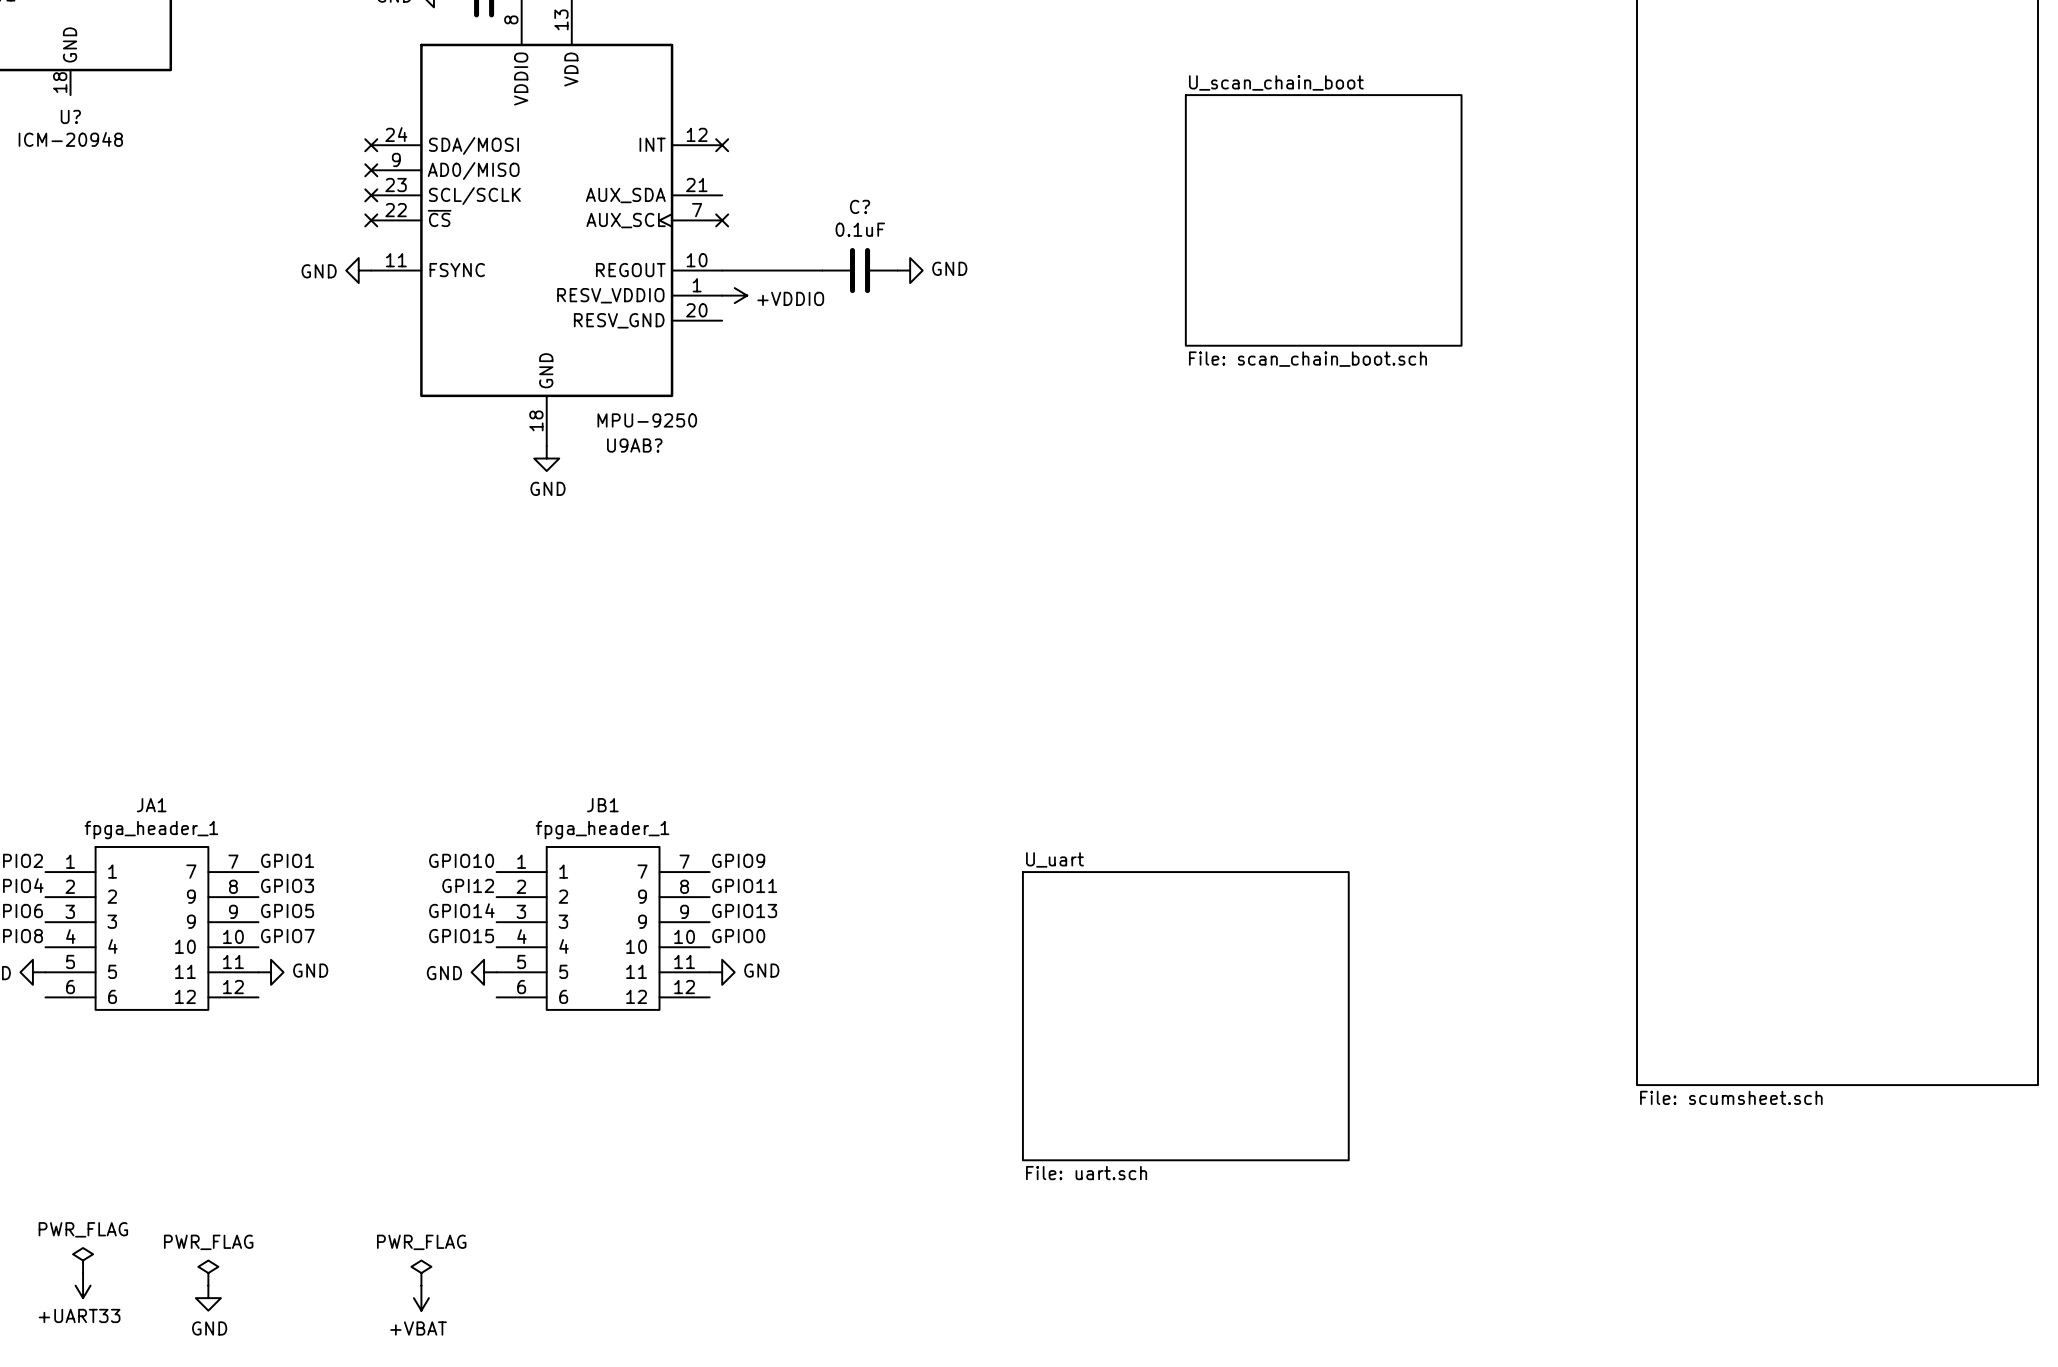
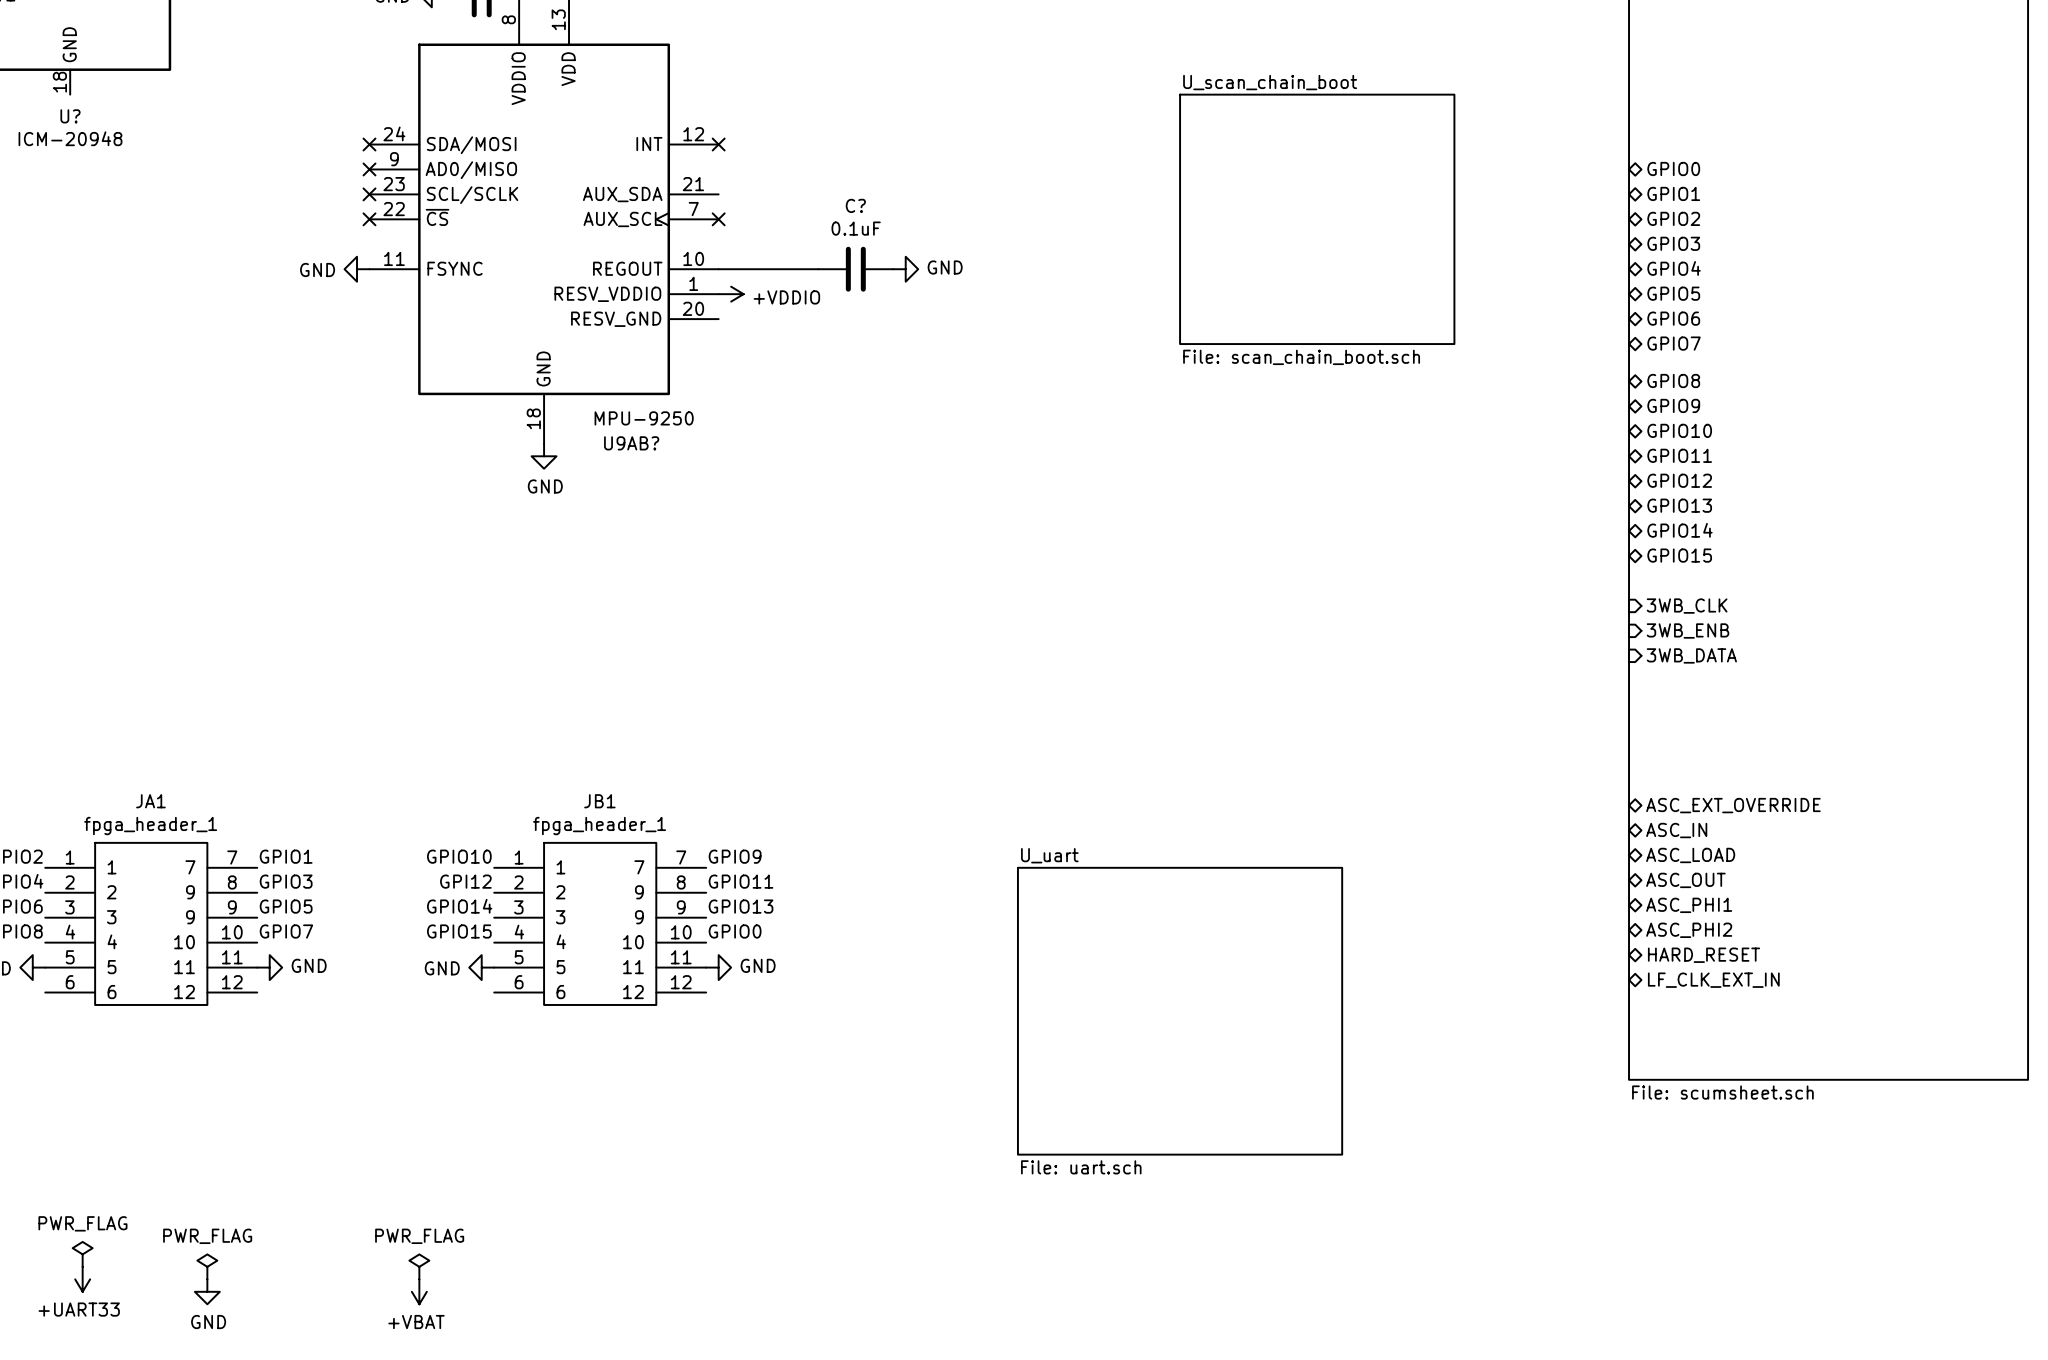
sheet pin: none -> GPIO0 (1673, 168)
sheet pin: none -> GPIO1 (1673, 193)
sheet pin: none -> GPIO2 (1673, 218)
sheet pin: none -> GPIO3 (1673, 243)
sheet pin: none -> GPIO4 (1674, 268)
sheet pin: none -> GPIO5 (1673, 293)
sheet pin: none -> GPIO6 (1673, 318)
sheet pin: none -> GPIO7 (1674, 343)
sheet pin: none -> GPIO8 (1673, 380)
sheet pin: none -> GPIO9 (1673, 405)
sheet pin: none -> GPIO10 (1679, 430)
sheet pin: none -> GPIO11 (1679, 455)
sheet pin: none -> GPIO12 (1679, 480)
sheet pin: none -> GPIO13 (1679, 505)
sheet pin: none -> GPIO14 (1679, 530)
sheet pin: none -> GPIO15 (1679, 555)
sheet pin: none -> 3WB_CLK (1687, 606)
sheet pin: none -> 3WB_ENB (1687, 631)
sheet pin: none -> 3WB_DATA (1691, 655)
sheet pin: none -> ASC_EXT_OVERRIDE (1733, 805)
sheet pin: none -> ASC_IN (1676, 830)
sheet pin: none -> ASC_LOAD (1690, 855)
sheet pin: none -> ASC_OUT (1685, 880)
sheet pin: none -> ASC_PHI1 (1689, 905)
sheet pin: none -> ASC_PHI2 (1689, 930)
sheet pin: none -> HARD_RESET (1704, 955)
sheet pin: none -> LF_CLK_EXT_IN (1713, 980)

